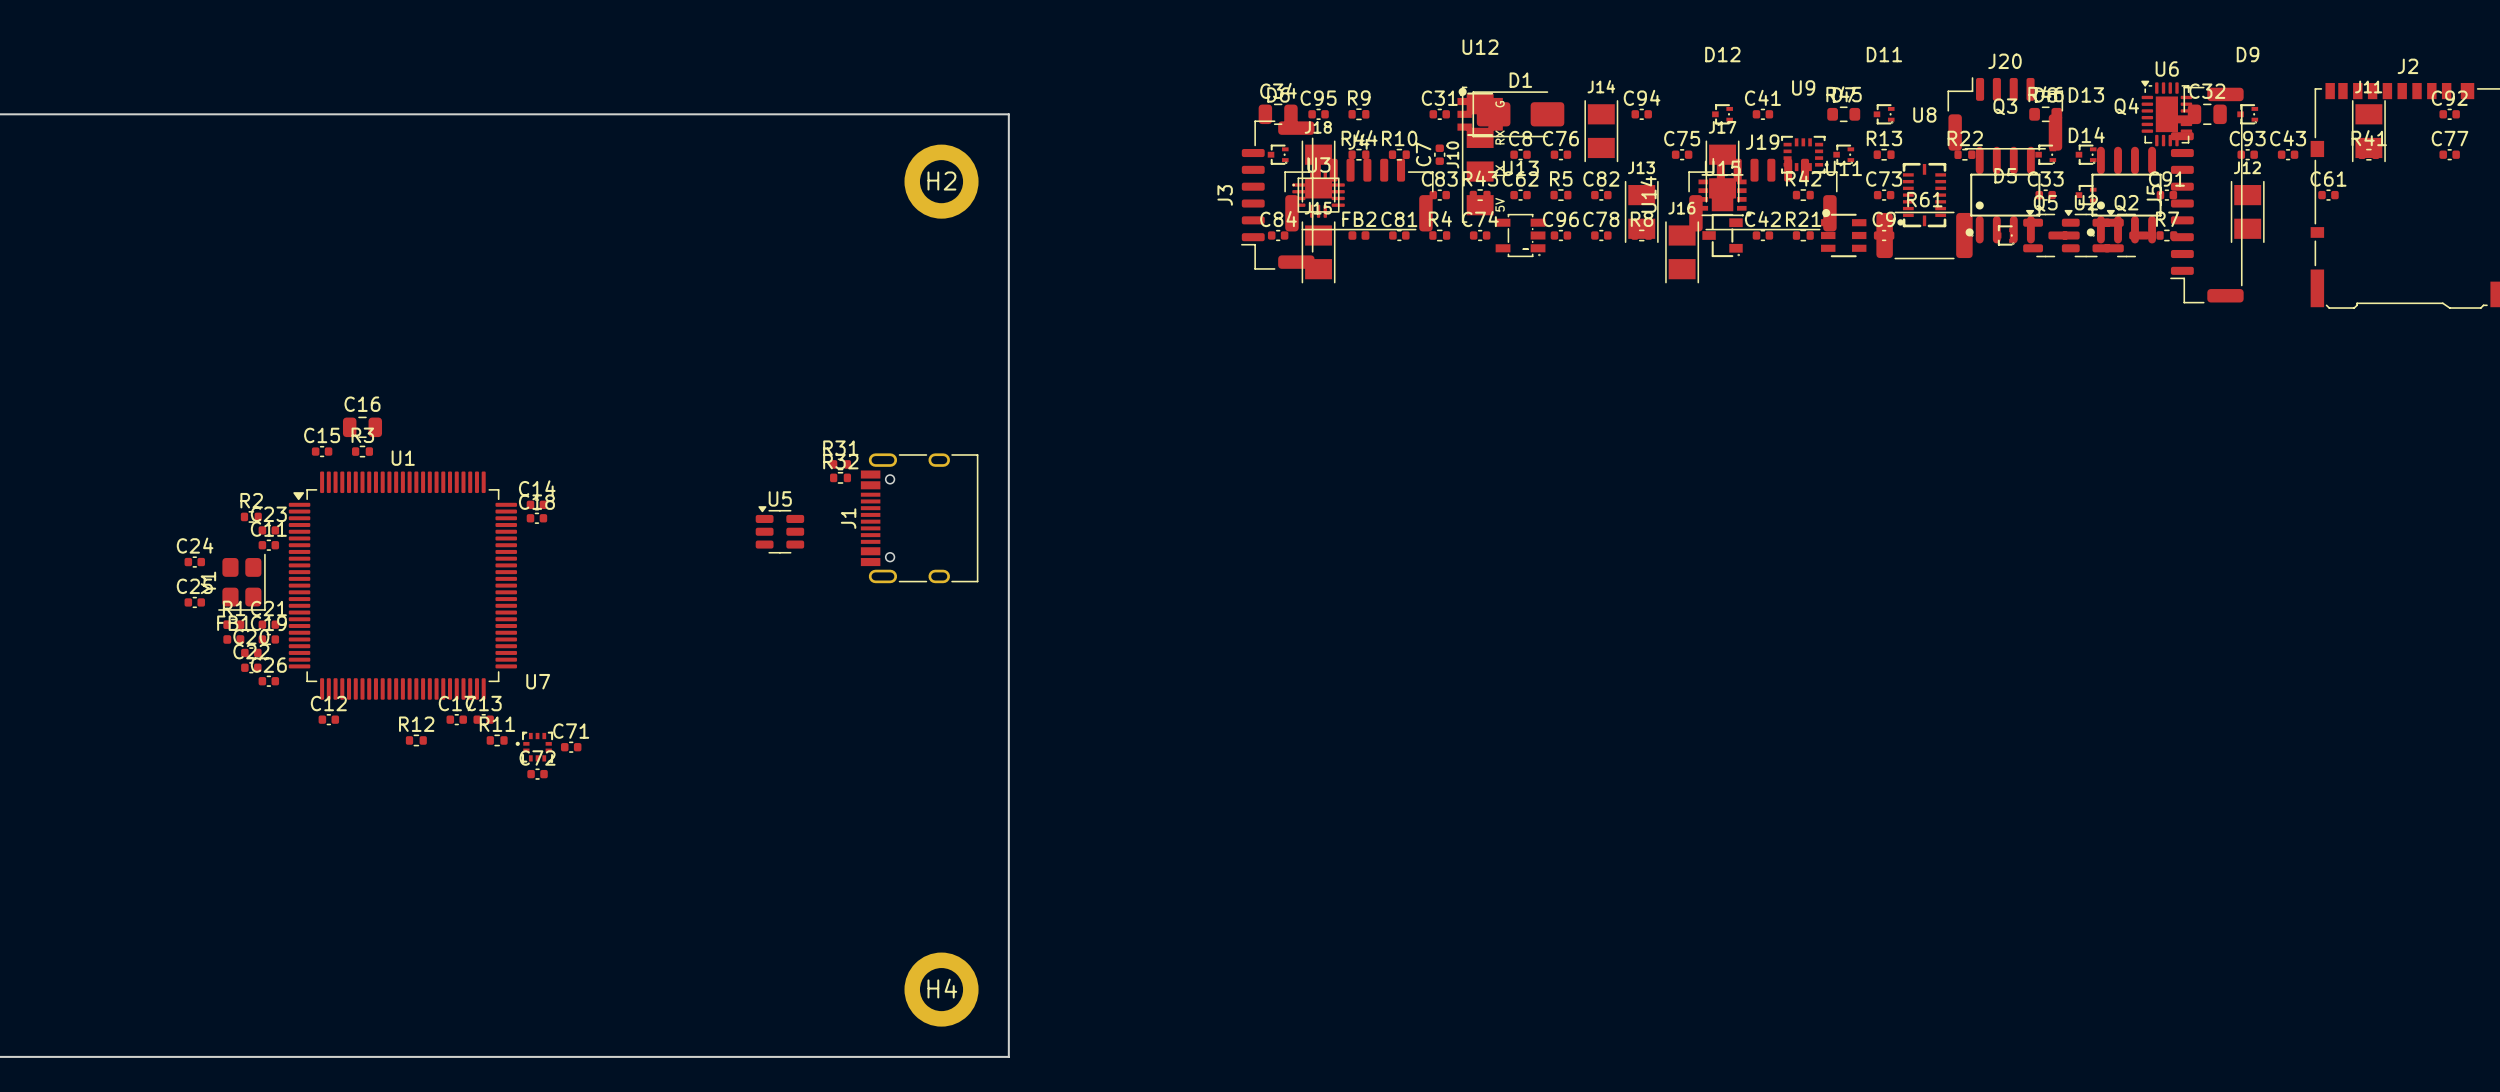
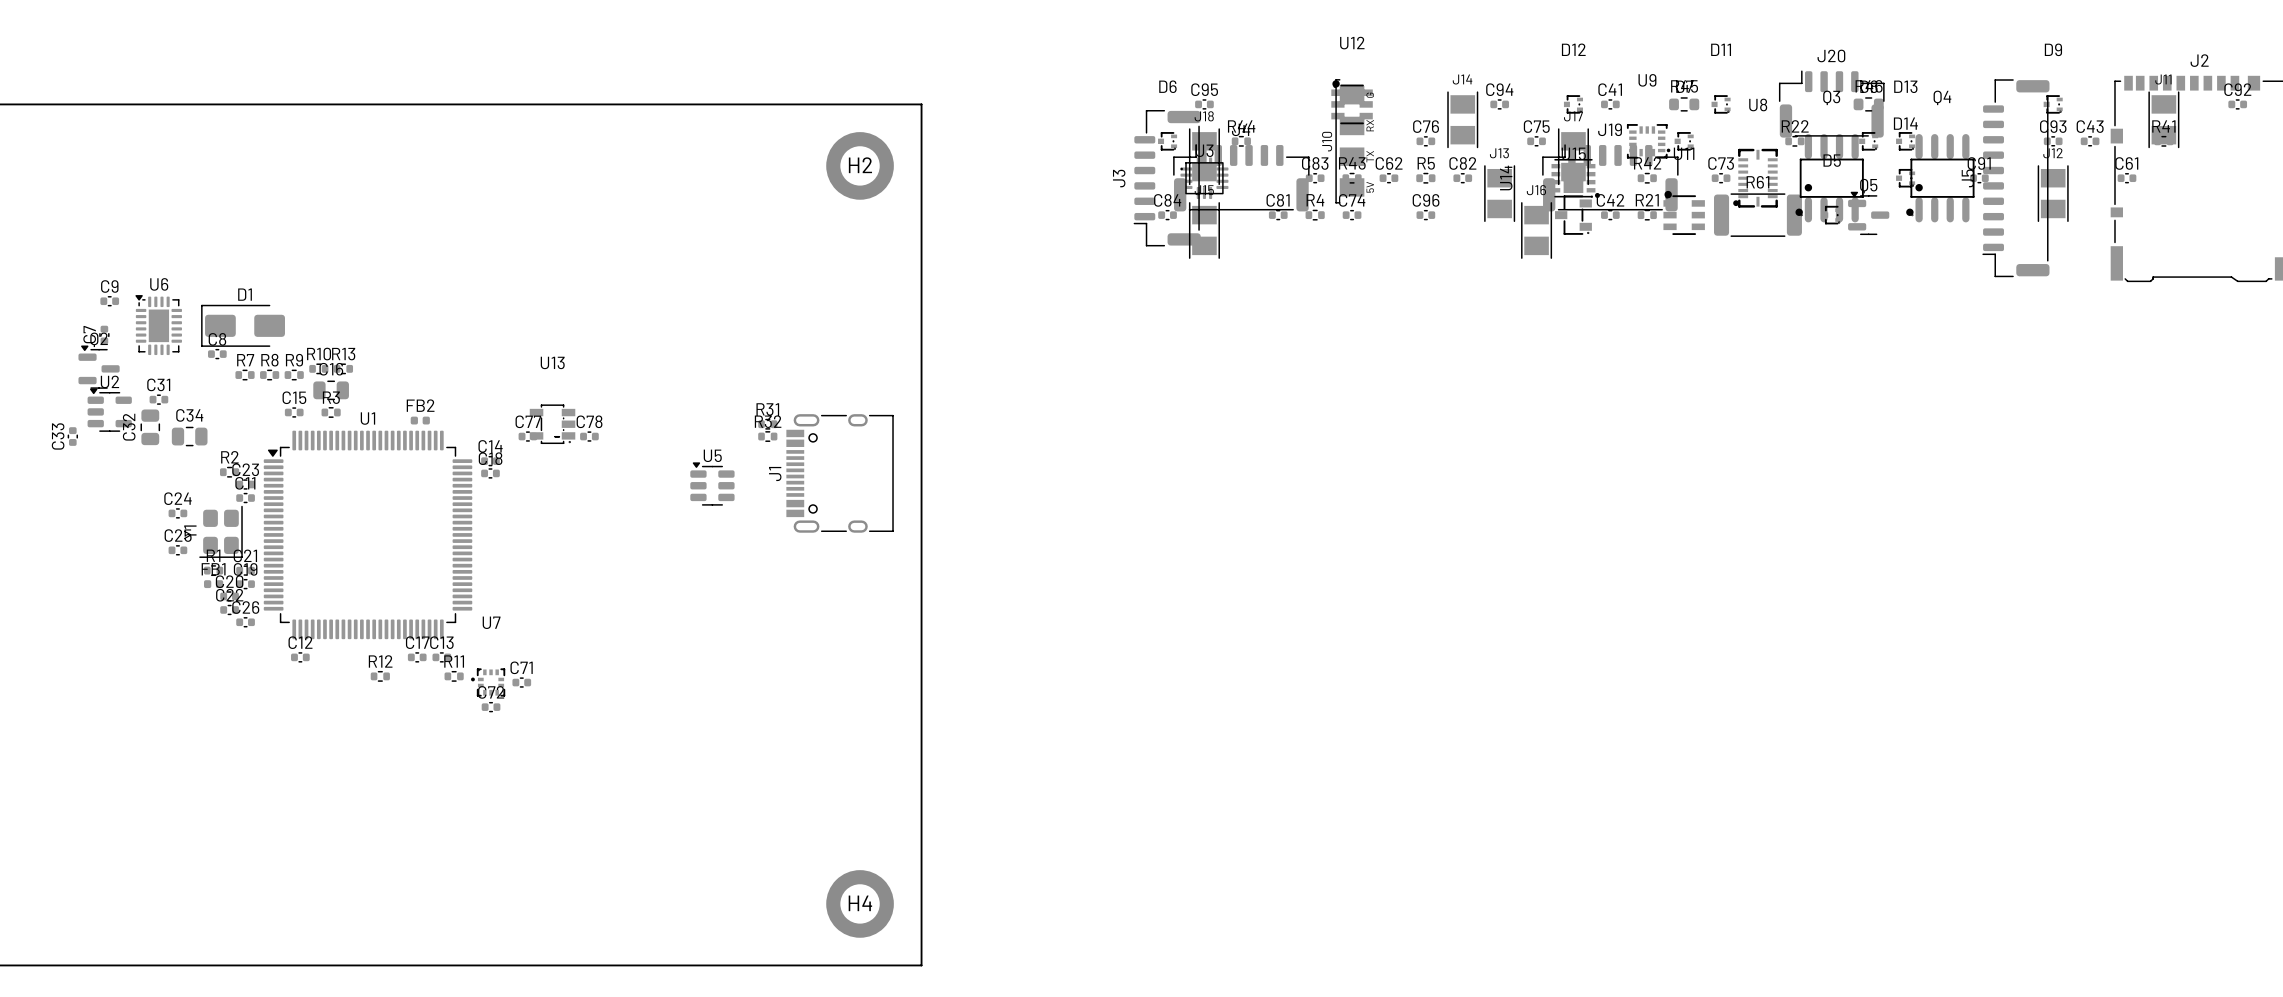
C32 name position: C32 (2207, 91) -> C32 (129, 427)
U6 position: (2166, 113) -> (158, 325)
C34 position: (1278, 114) -> (189, 436)
R9 position: (1358, 114) -> (294, 375)
C31 position: (1439, 114) -> (158, 399)
D1 position: (1518, 114) -> (243, 325)
C32 rotation: 0° (2207, 114) -> 90° clockwise (150, 427)
C32 position: (2207, 114) -> (150, 427)
R10 position: (1399, 154) -> (318, 368)
C7 position: (1439, 154) -> (104, 335)
C8 position: (1520, 154) -> (217, 354)
R13 position: (1884, 154) -> (343, 368)
C77 position: (2449, 154) -> (527, 436)
C33 rotation: 0° (2045, 195) -> 90° clockwise (72, 436)
C33 position: (2045, 195) -> (72, 436)
U2 position: (2086, 233) -> (109, 410)
Q2 position: (2126, 233) -> (99, 367)
FB2 position: (1358, 235) -> (420, 420)
U13 position: (1520, 235) -> (552, 424)
C78 position: (1601, 235) -> (589, 436)
R8 position: (1641, 235) -> (269, 375)
C9 position: (1884, 235) -> (109, 301)
R7 position: (2166, 235) -> (245, 375)

